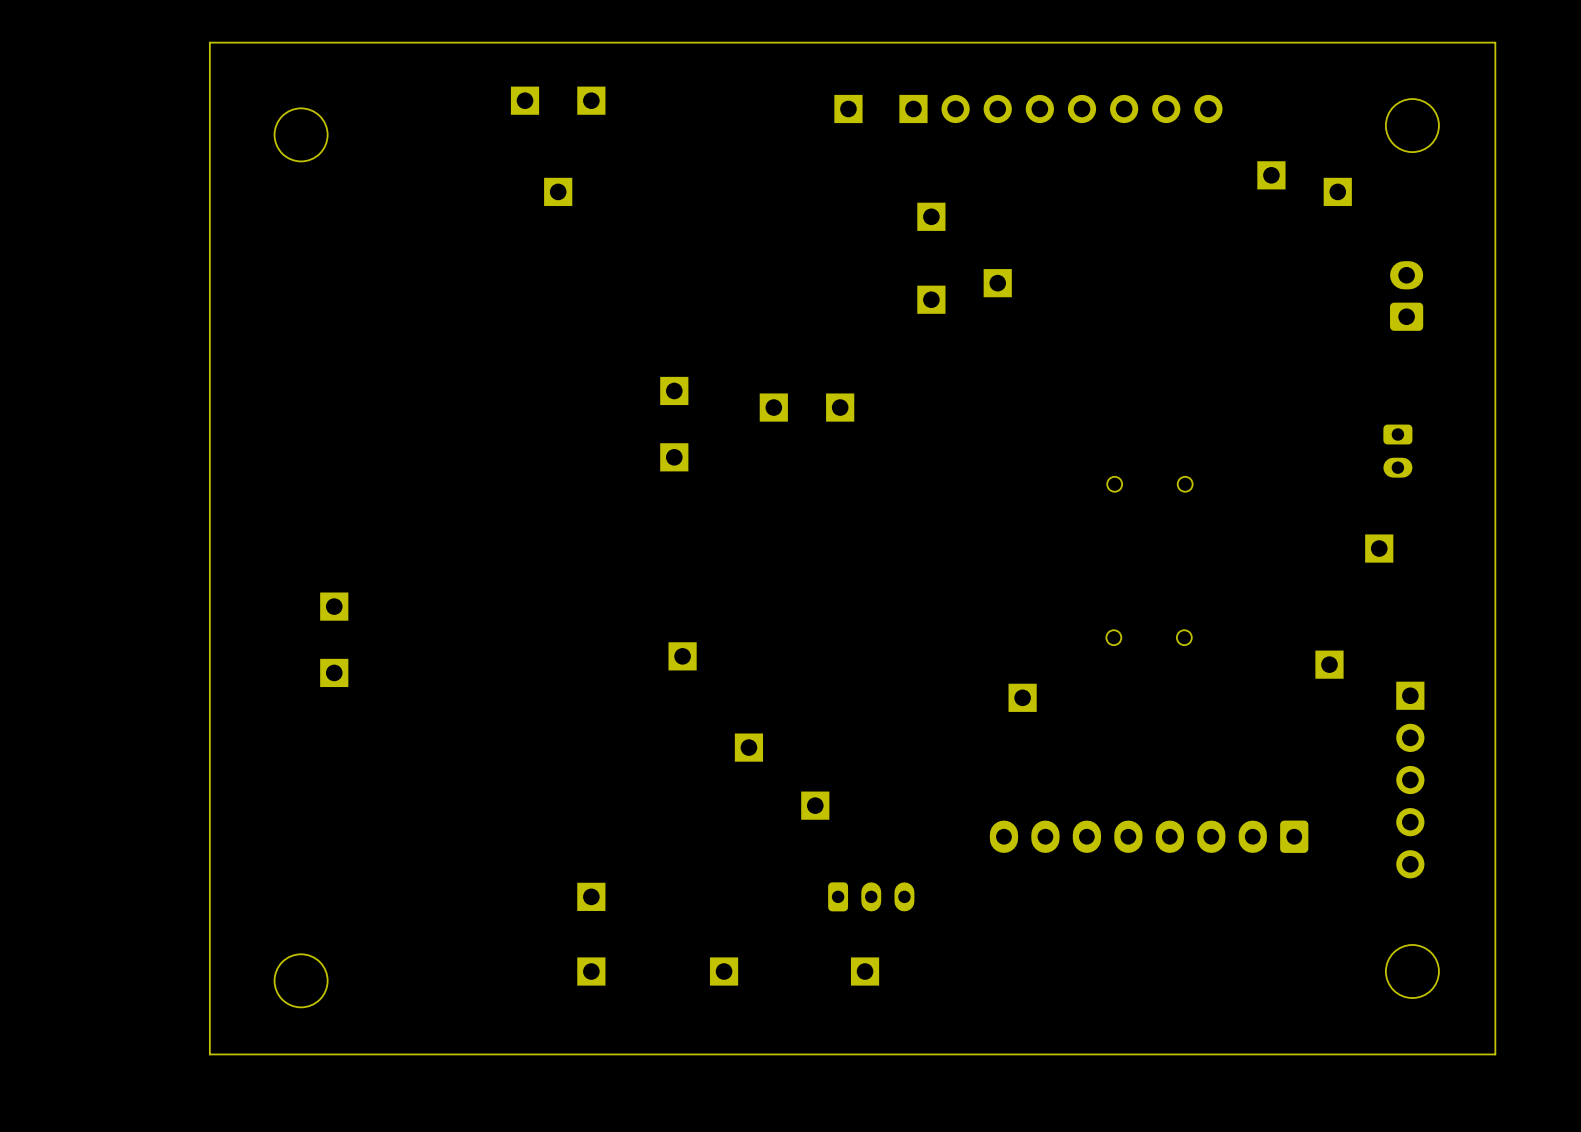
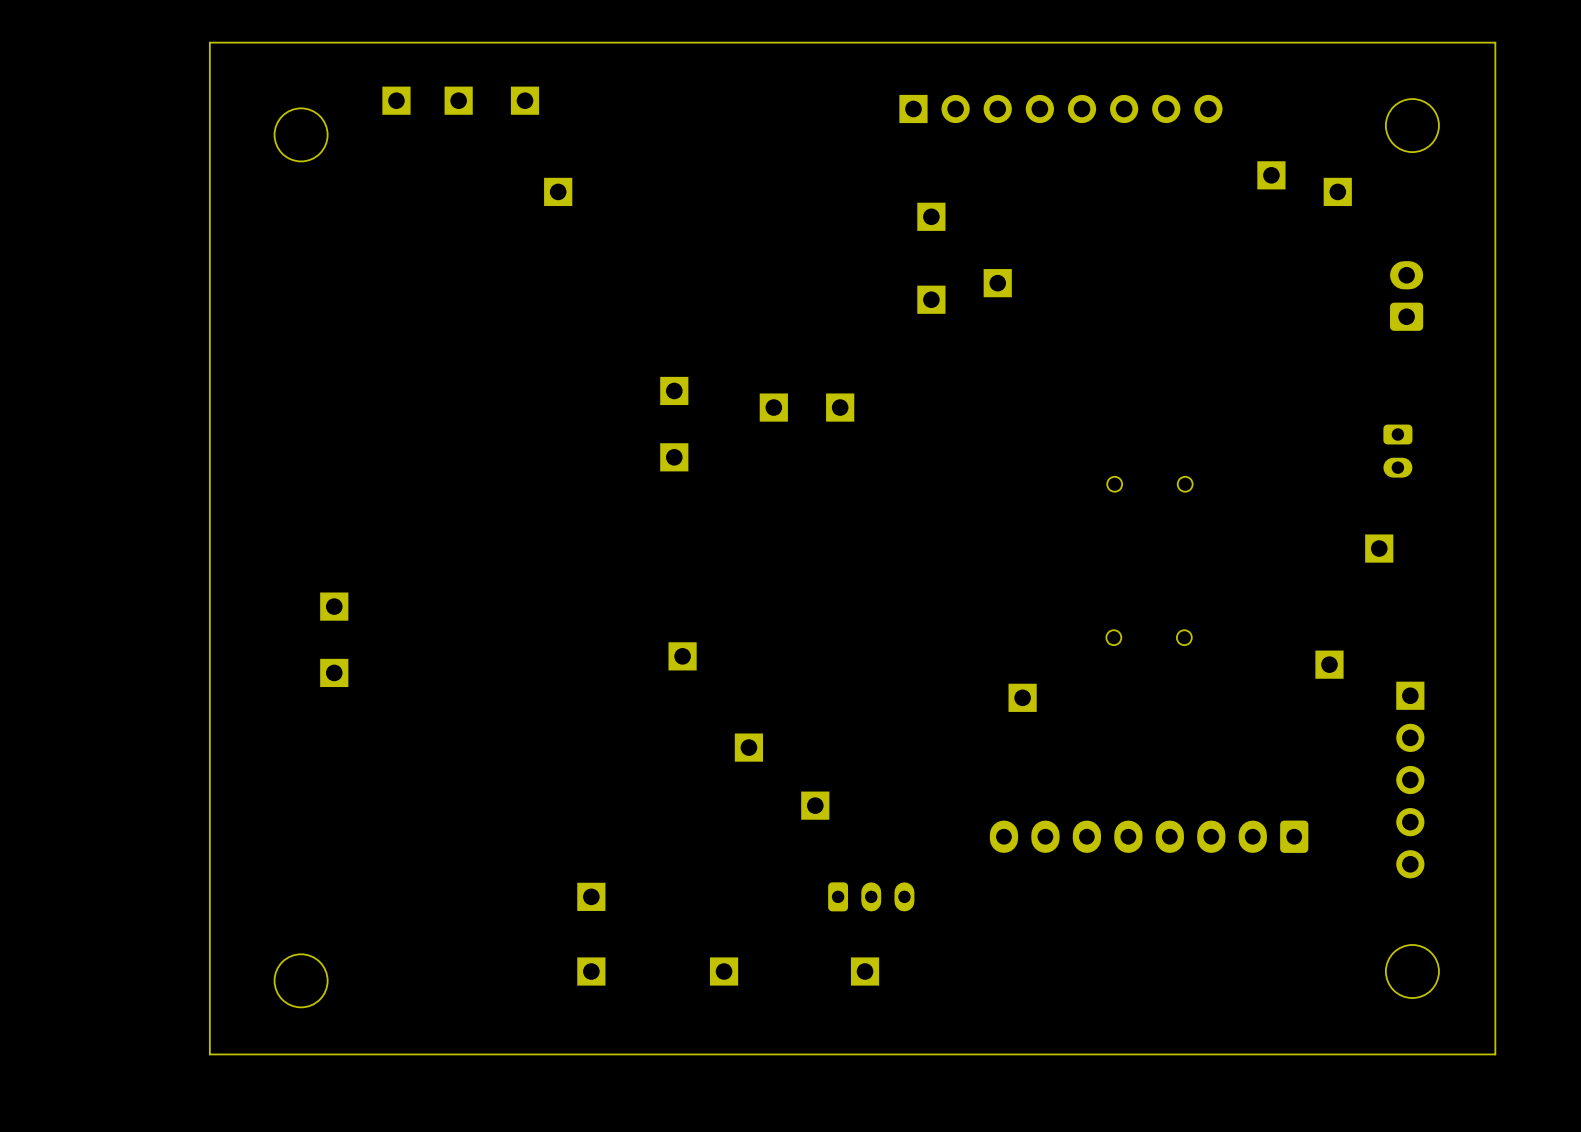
part: none -> (396, 100)
part: none -> (458, 100)
part: (591, 100) -> none
part: (848, 108) -> none

